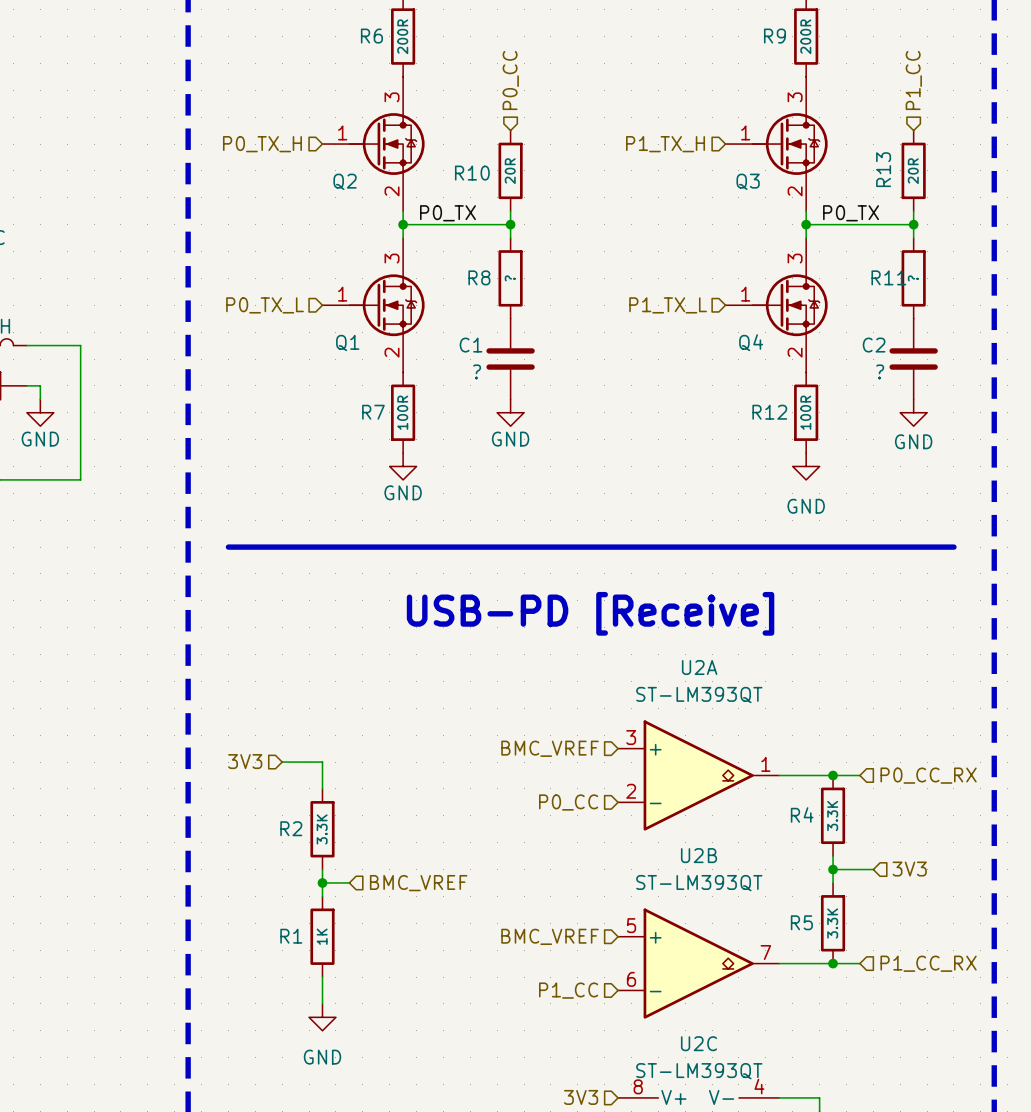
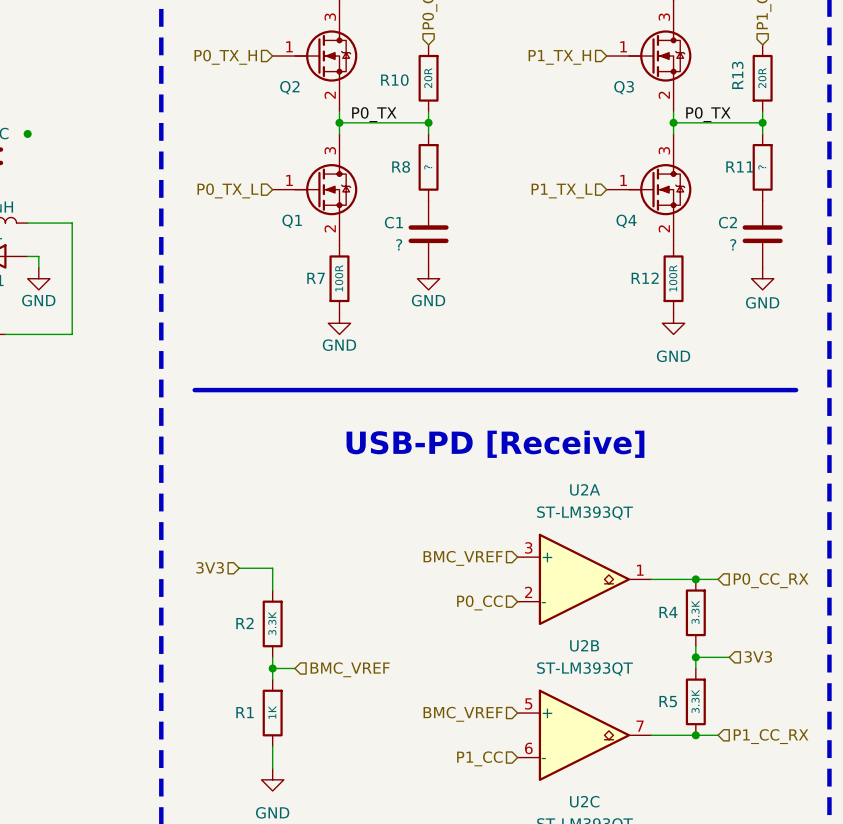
junction: none -> (27, 133)

